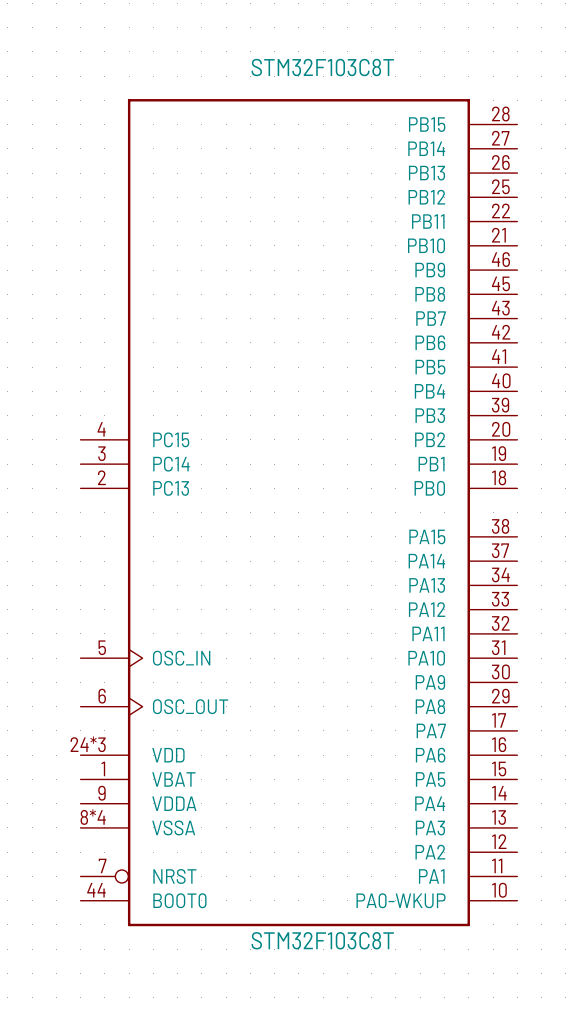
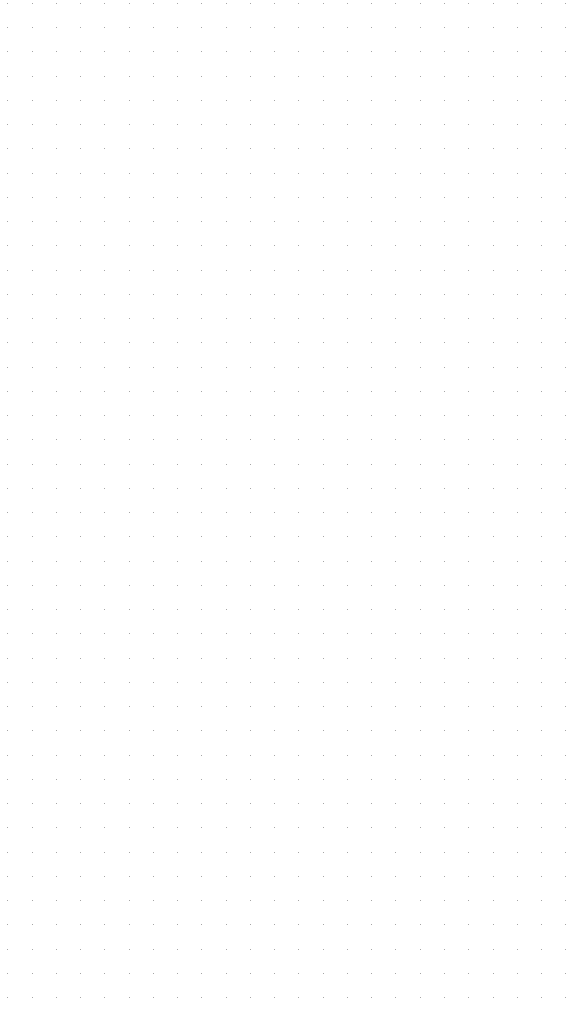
STM32F103C8T: STM32F103C8T (298, 512) -> none

